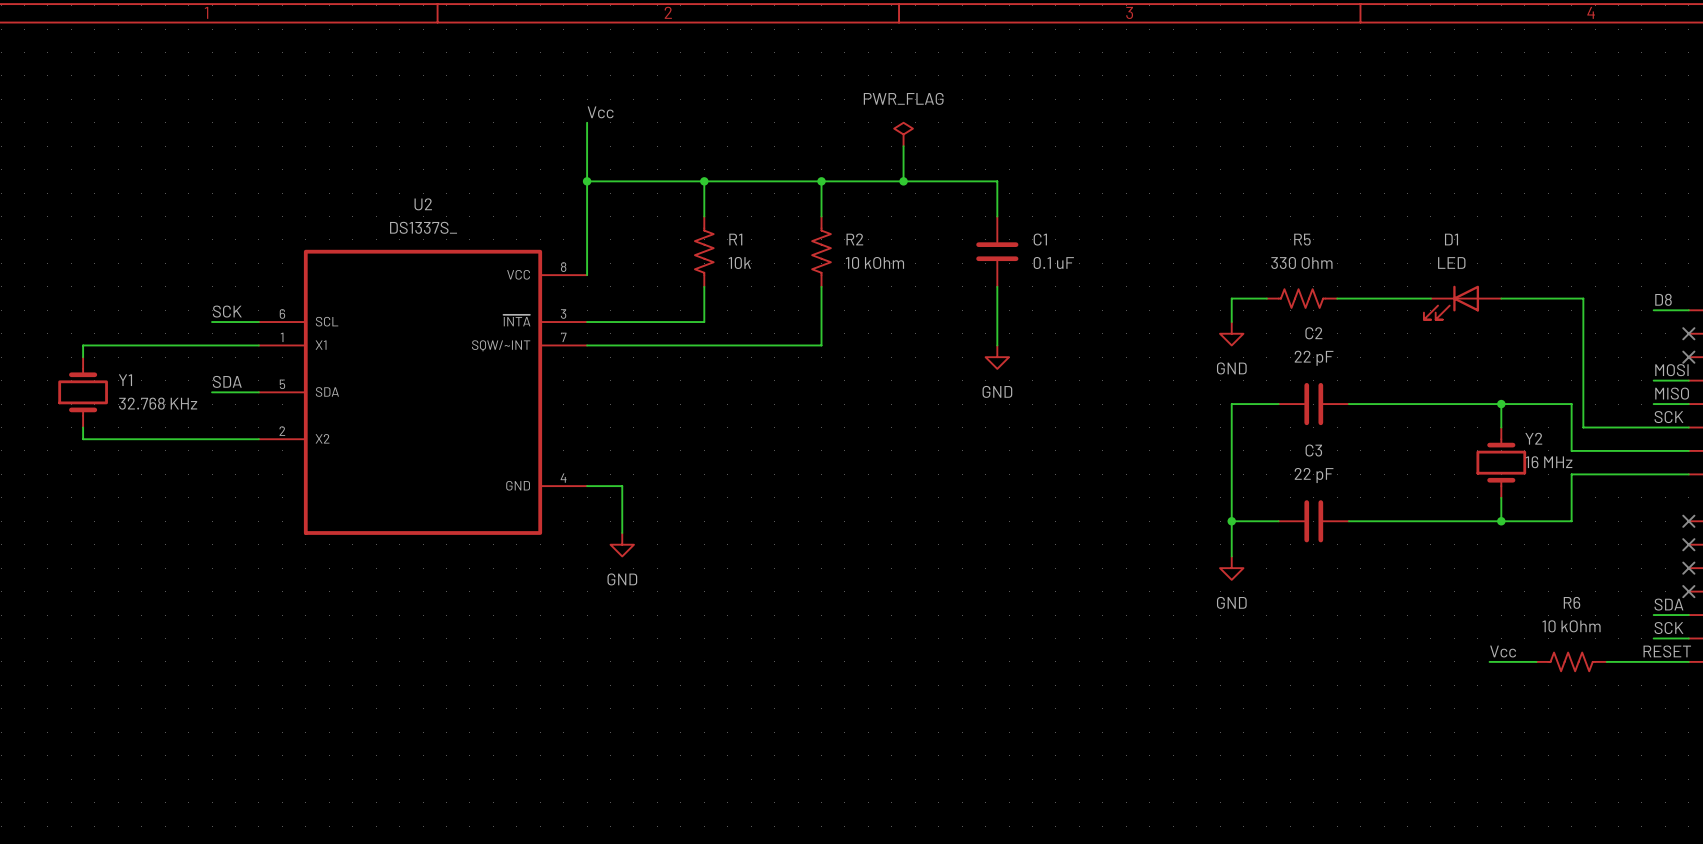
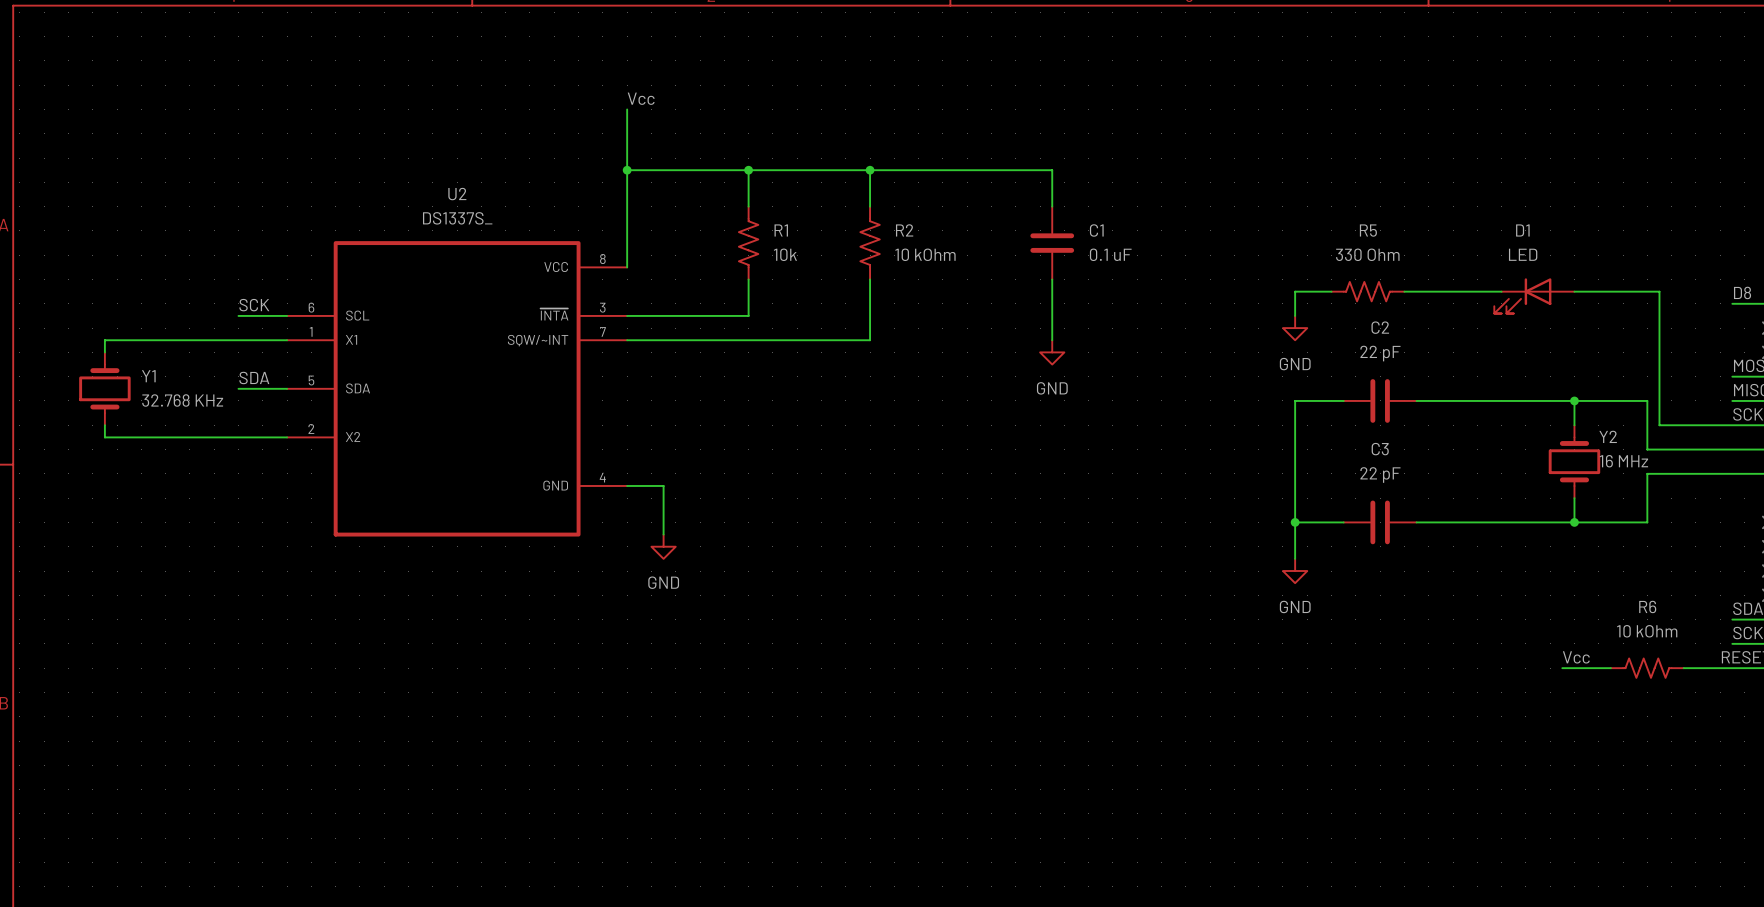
power symbol: PWR_FLAG (903, 134) -> none
wire: (903, 146) (903, 181) -> none
junction: (903, 181) -> none

